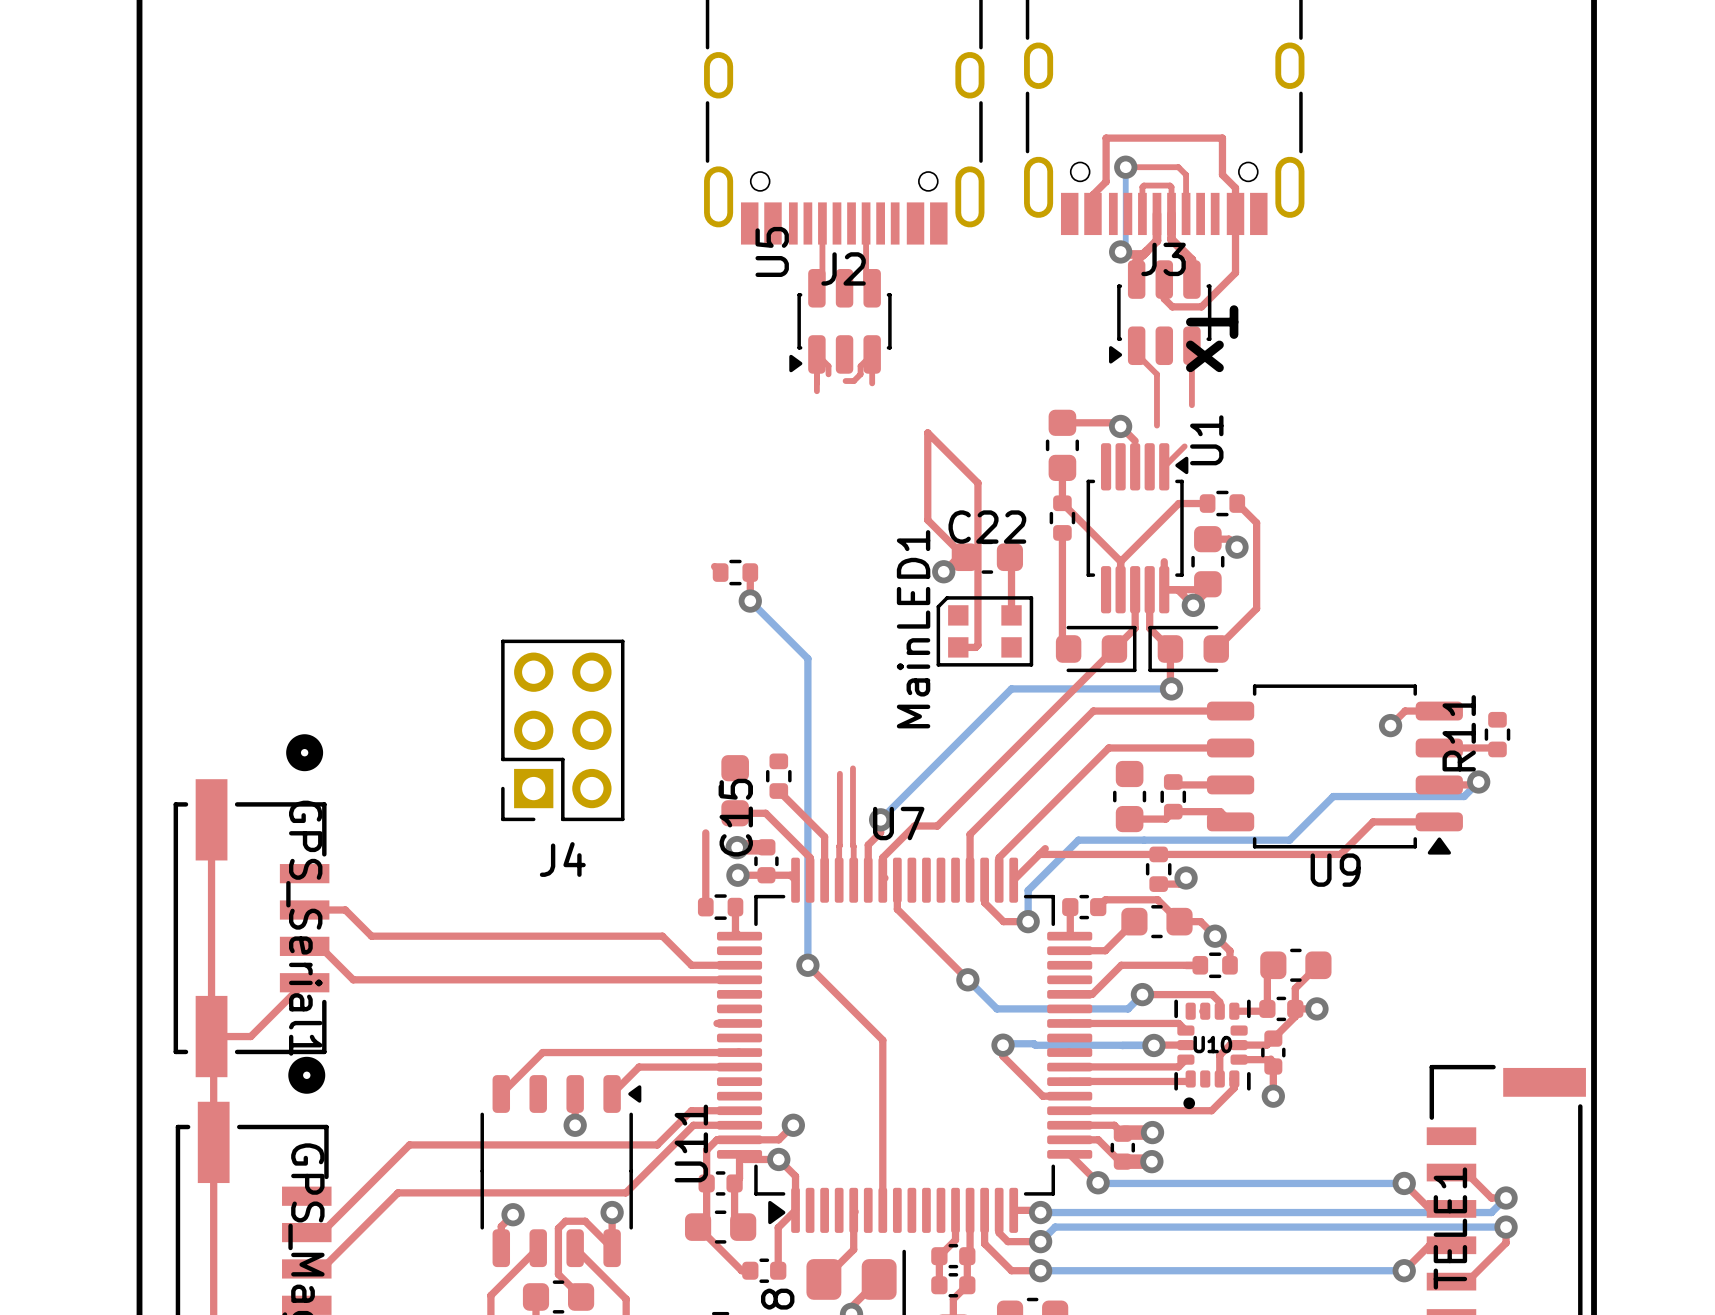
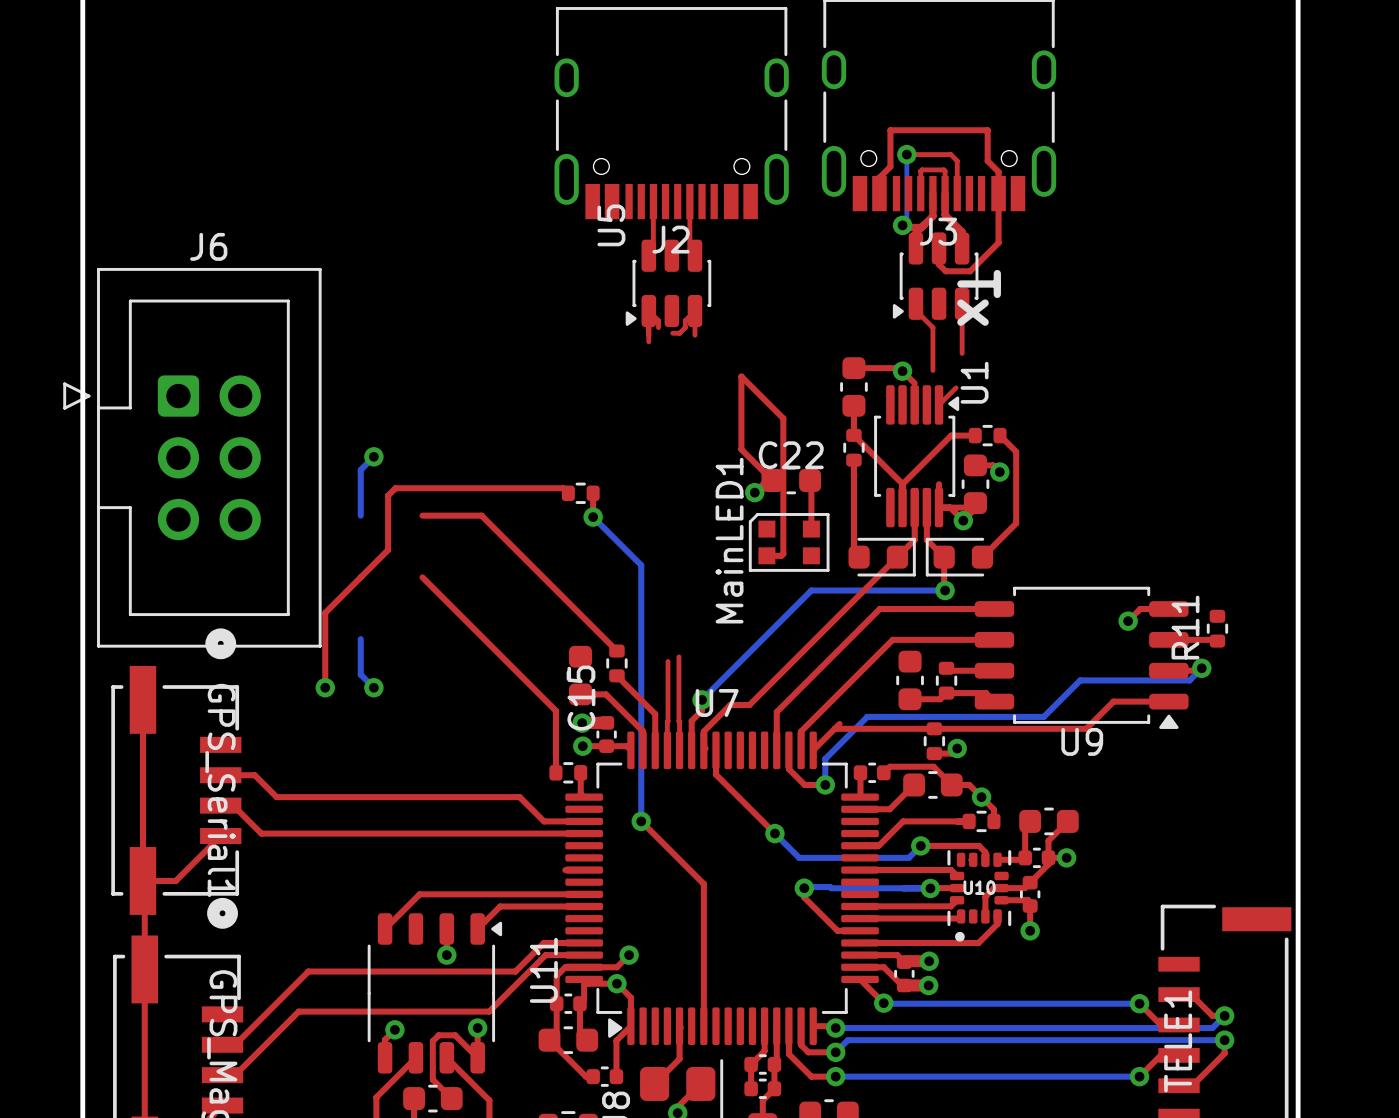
bottom track: none -> (373, 456) (360, 469) (360, 515)
via: none -> (373, 456)
J6: none -> (192, 457)
top track: none -> (563, 488) (395, 488) (388, 495) (388, 550) (325, 612) (325, 687)
top track: none -> (422, 515) (481, 515) (616, 651)
top track: none -> (422, 577) (555, 710)
J4: (562, 730) -> none
bottom track: none -> (360, 639) (360, 674) (373, 687)
via: none -> (325, 687)
via: none -> (373, 687)

